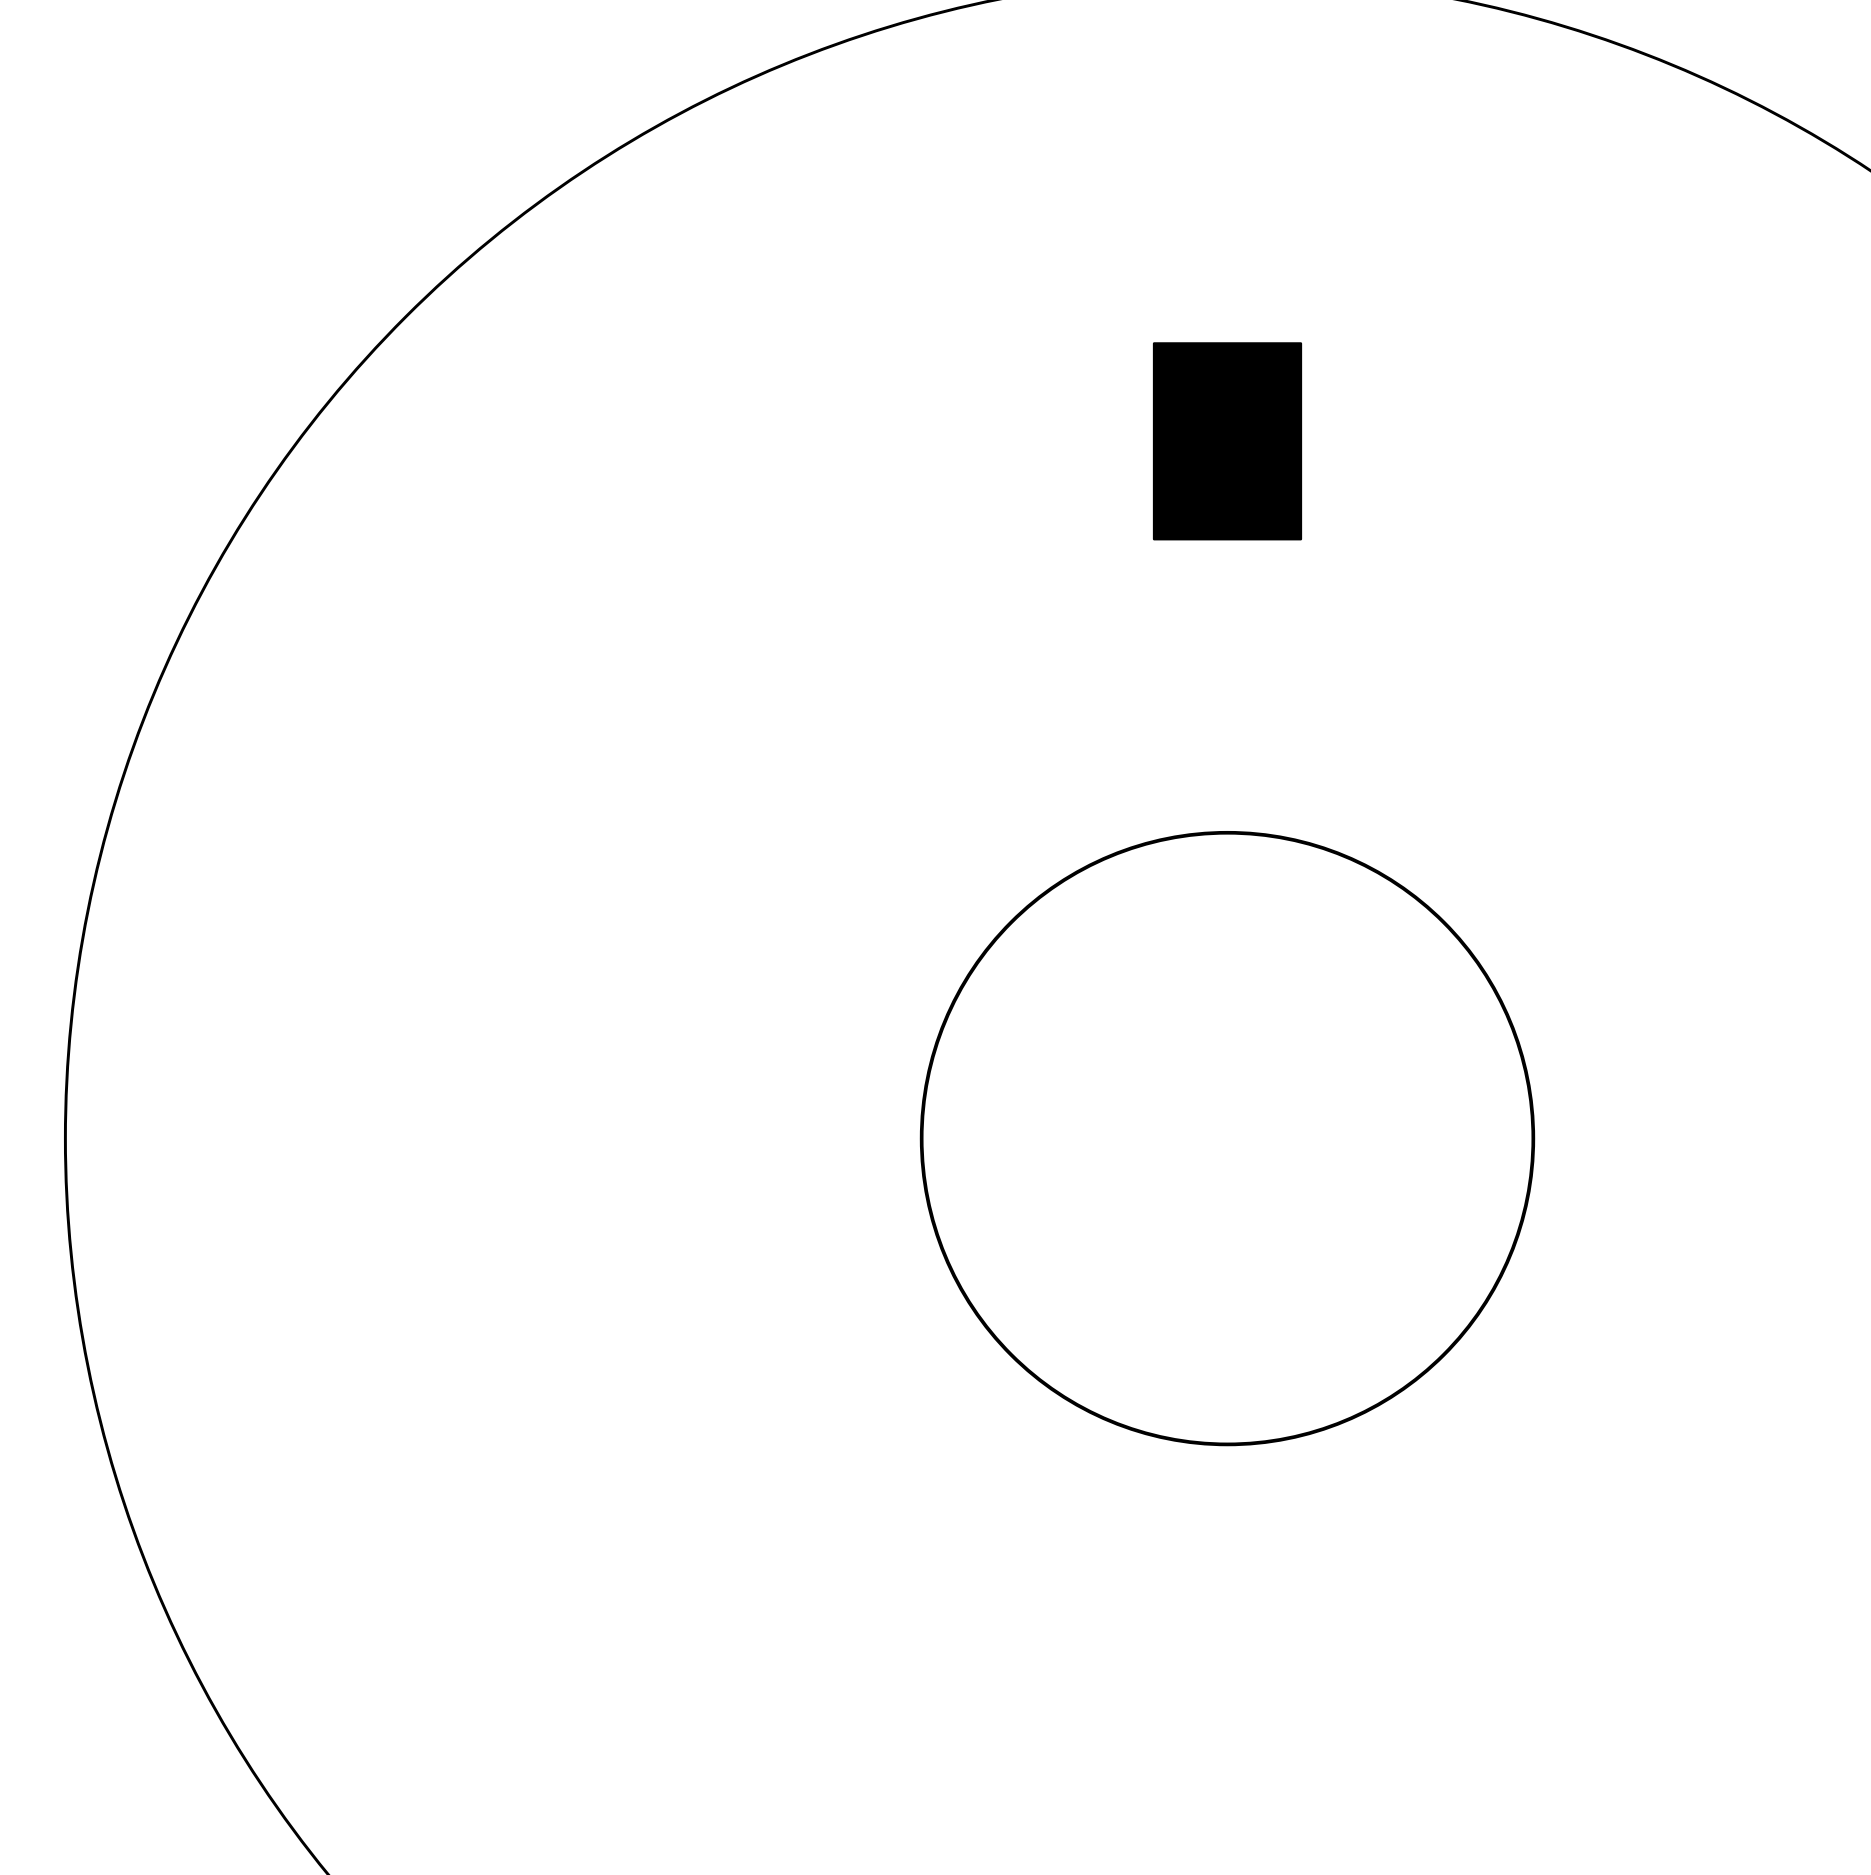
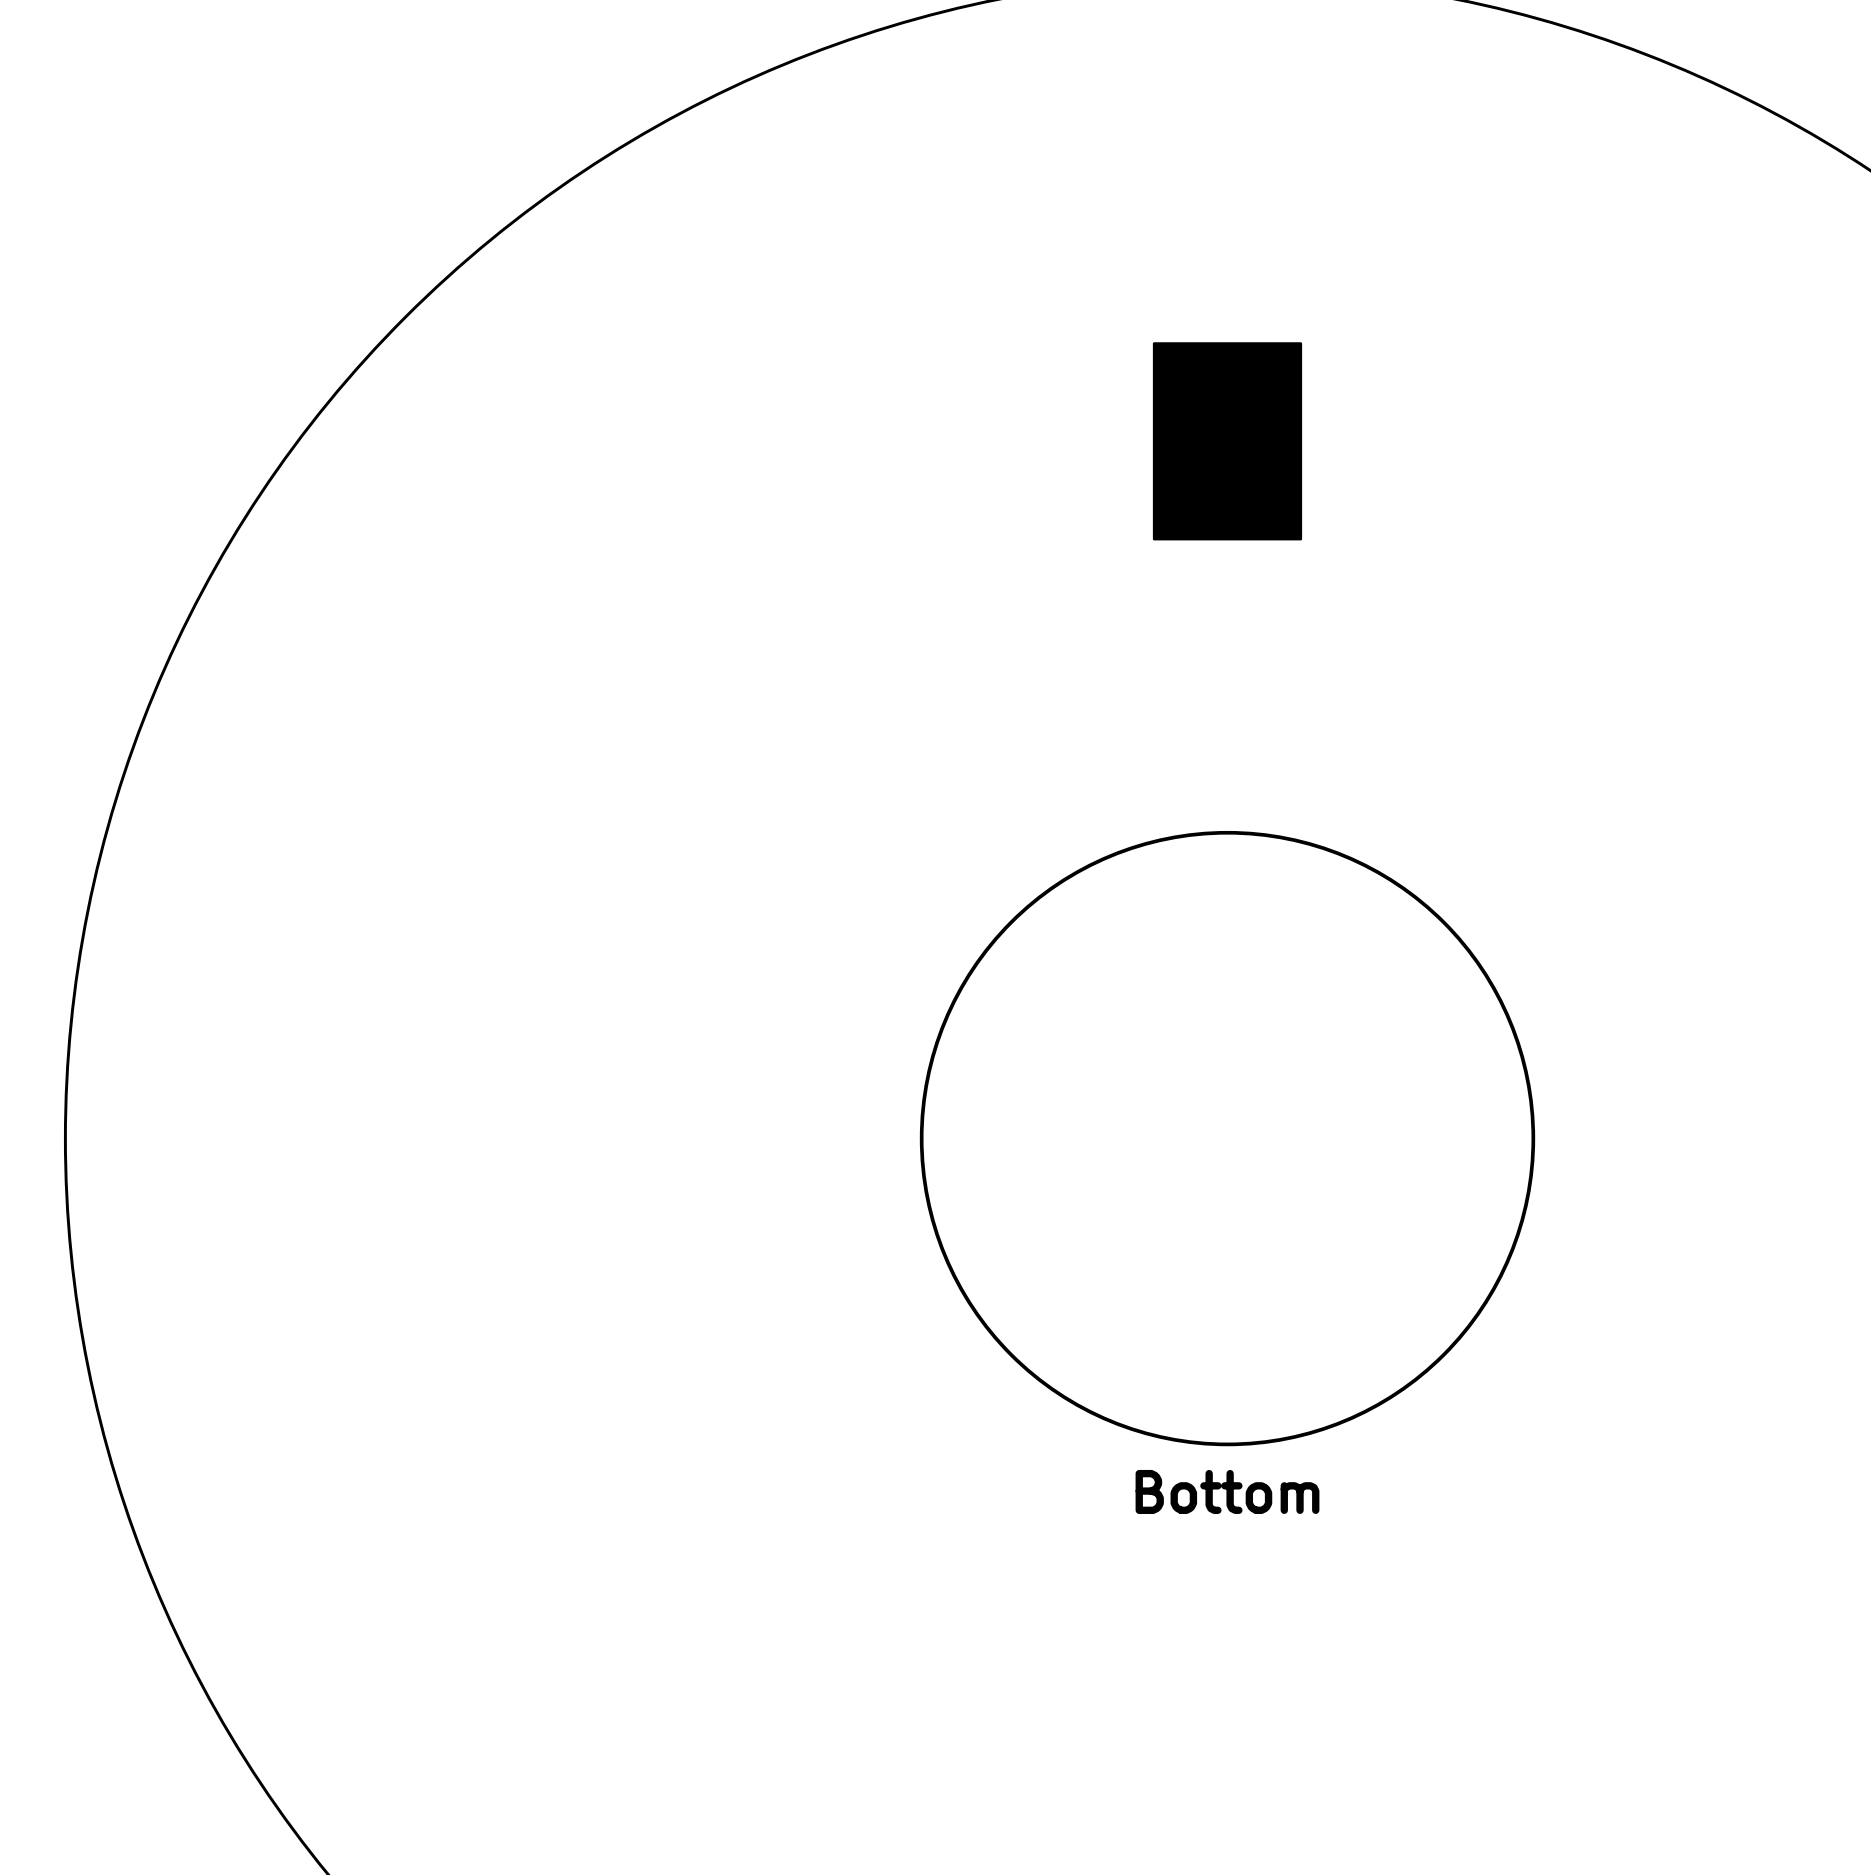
text: none -> Bottom (1227, 1491)

